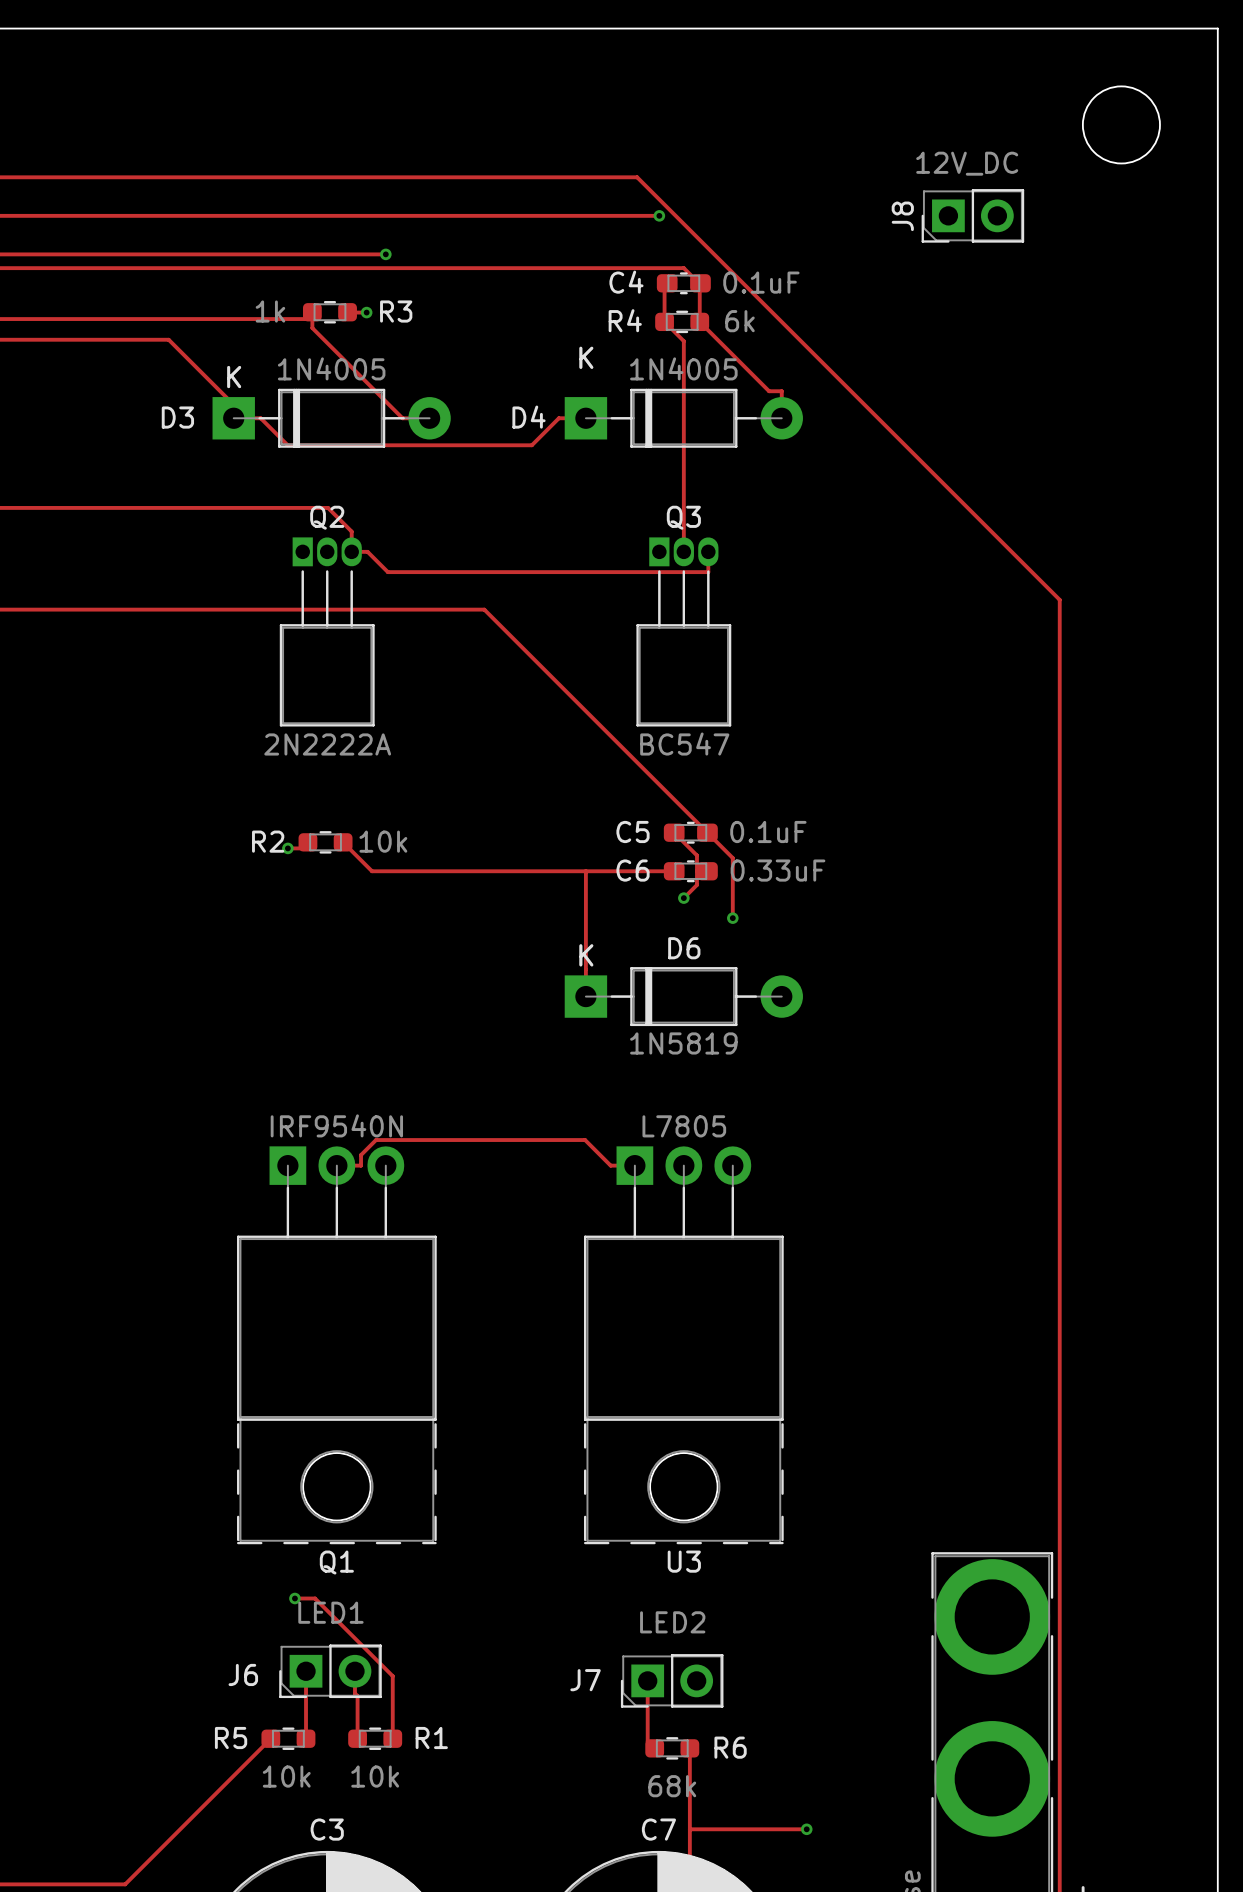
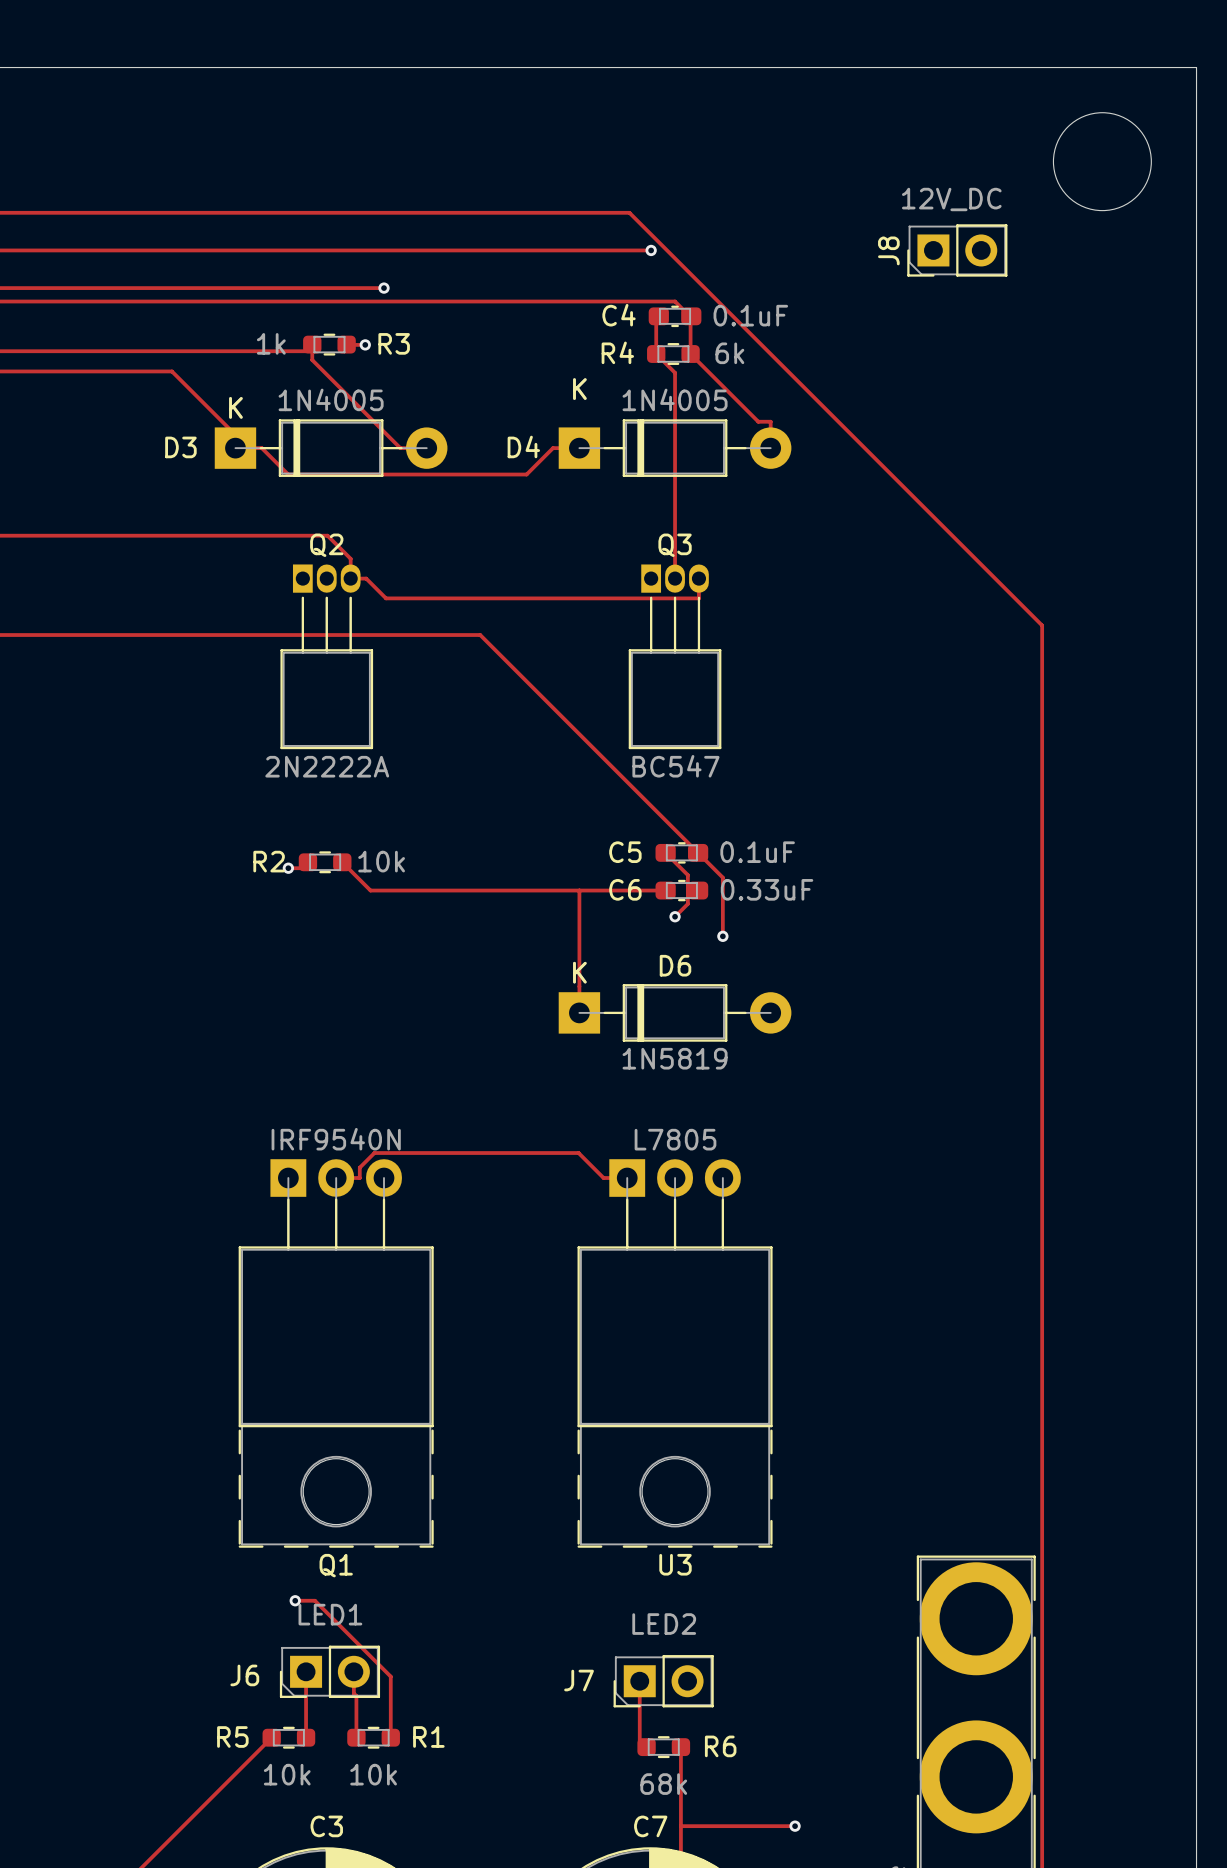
round board edge size: [1082, 85, 1161, 164] -> [1052, 112, 1152, 212]

